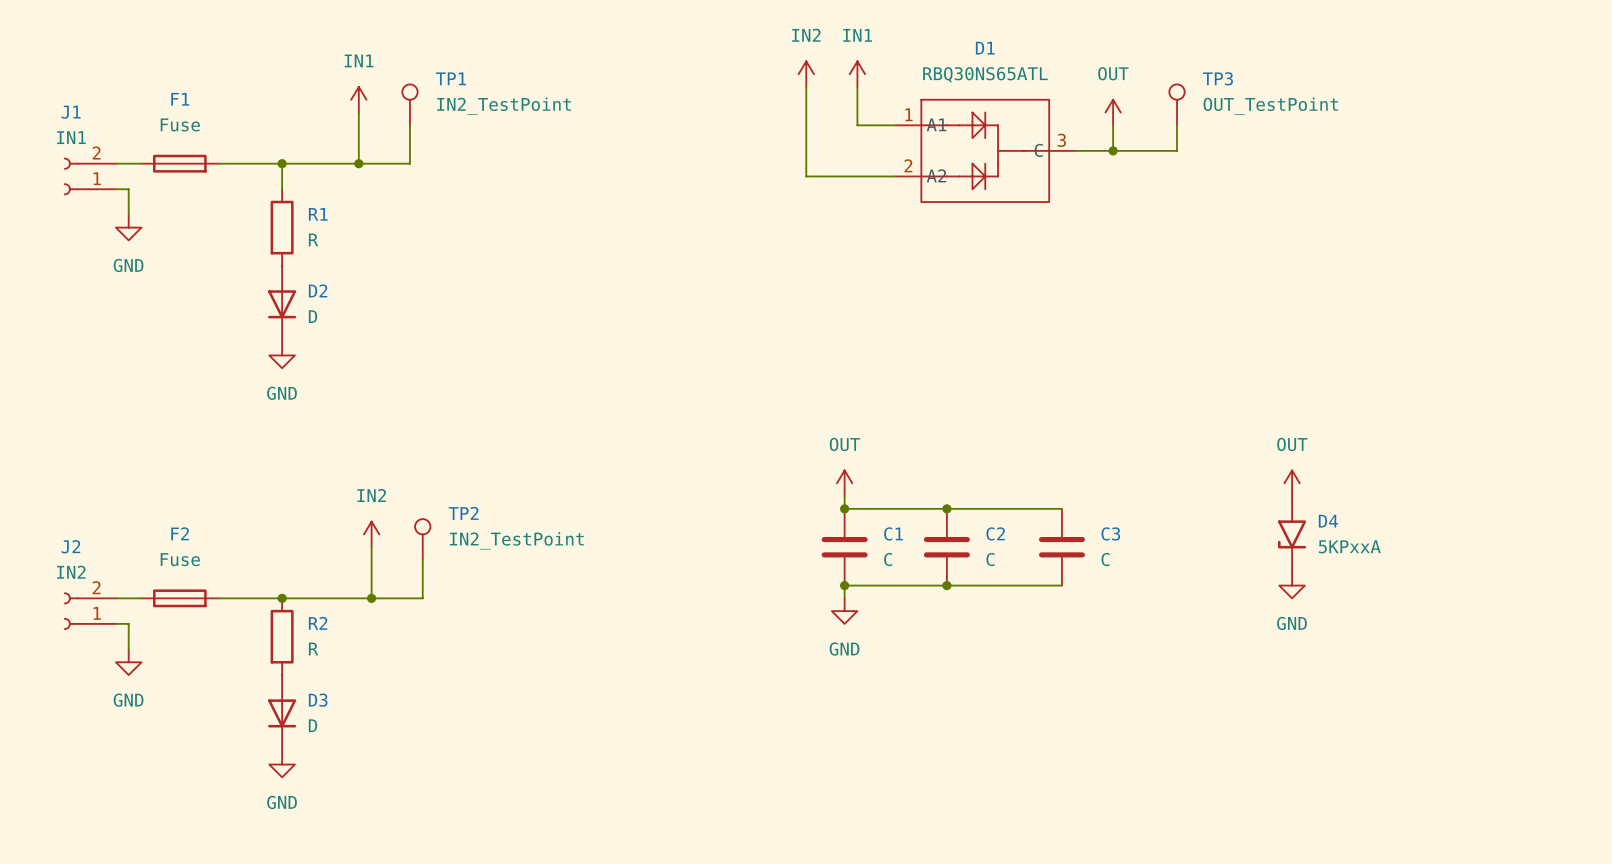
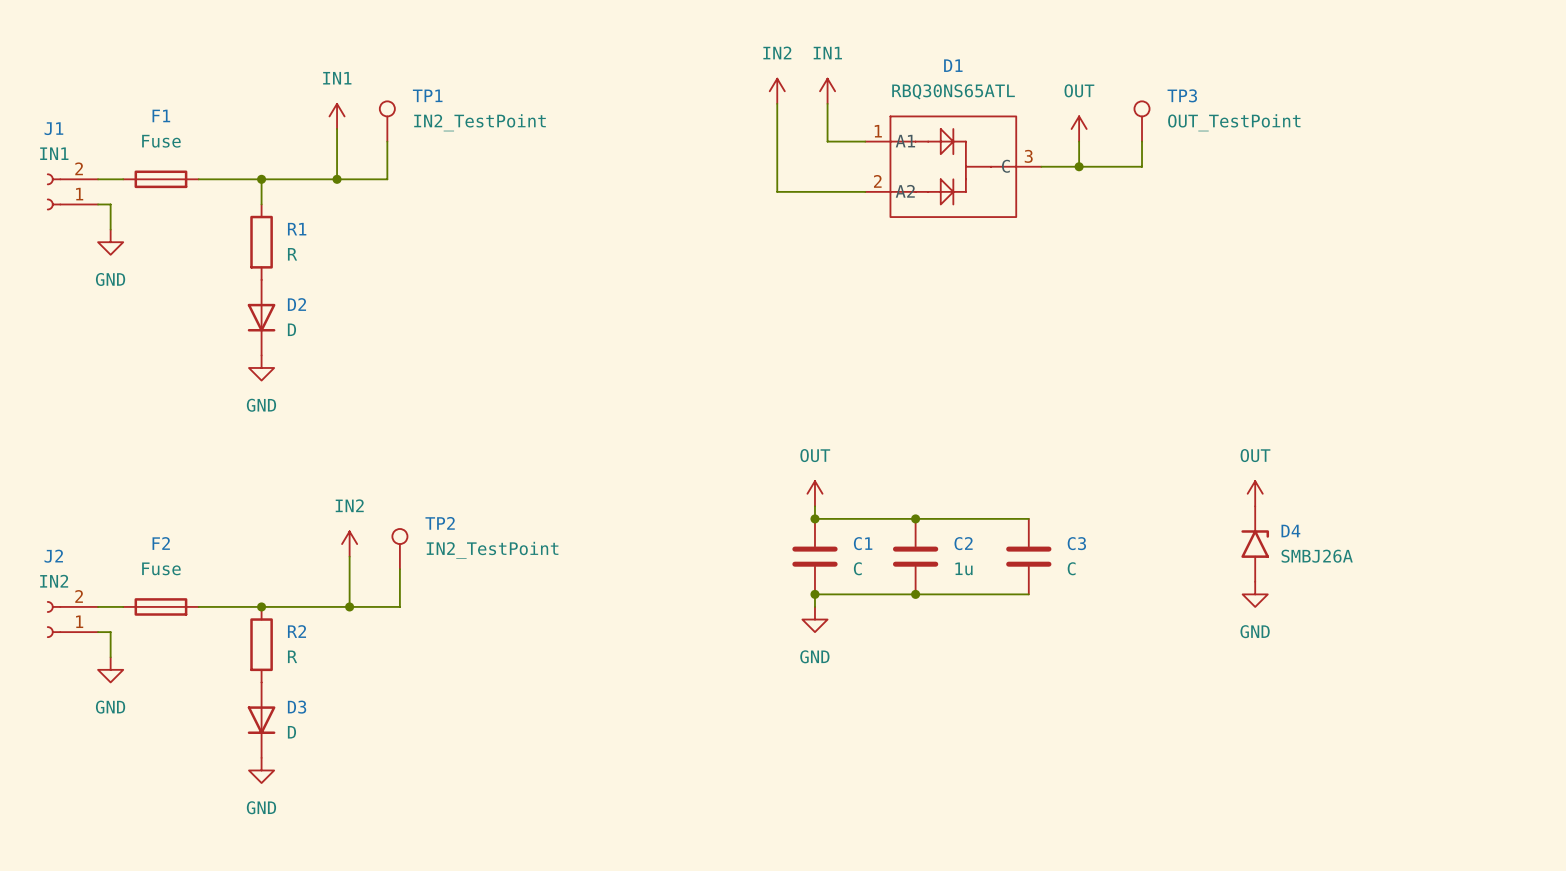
D4 rotation: 0° (1292, 534) -> 180° (1255, 544)
D4 value: 5KPxxA (1349, 546) -> SMBJ26A (1317, 556)
C2 value: C (990, 559) -> 1u (963, 568)

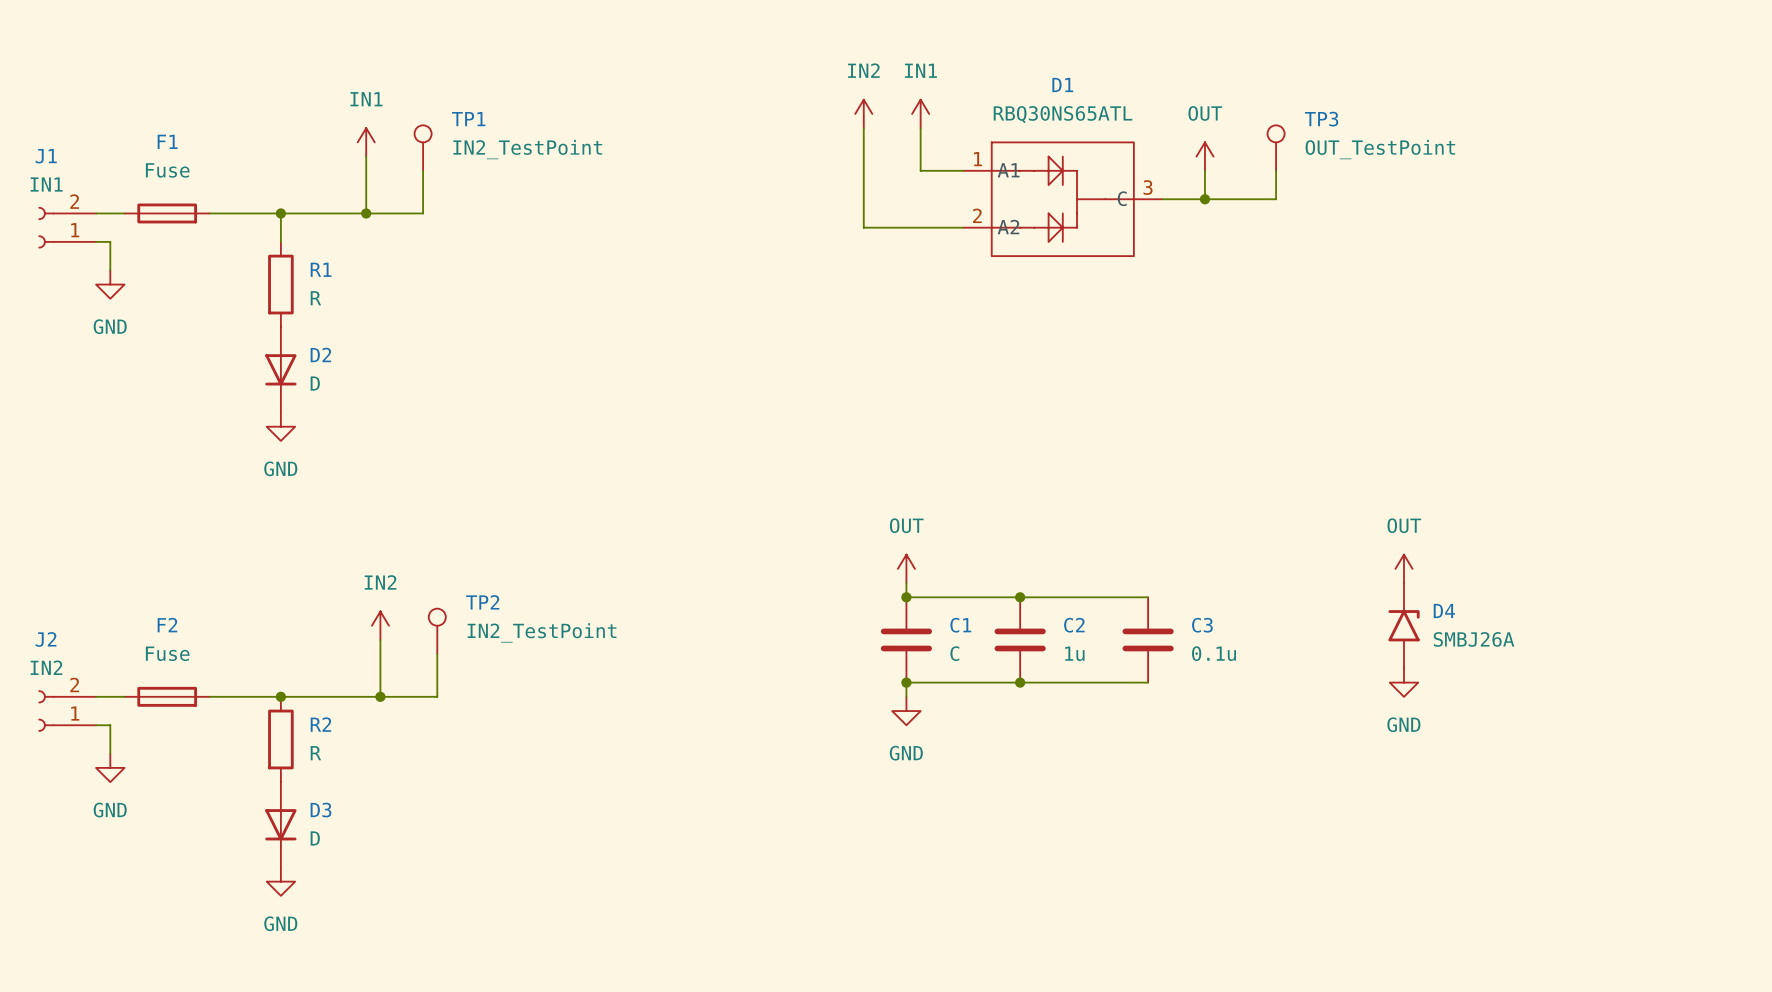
C3 value: C (1071, 568) -> 0.1u (1214, 653)

